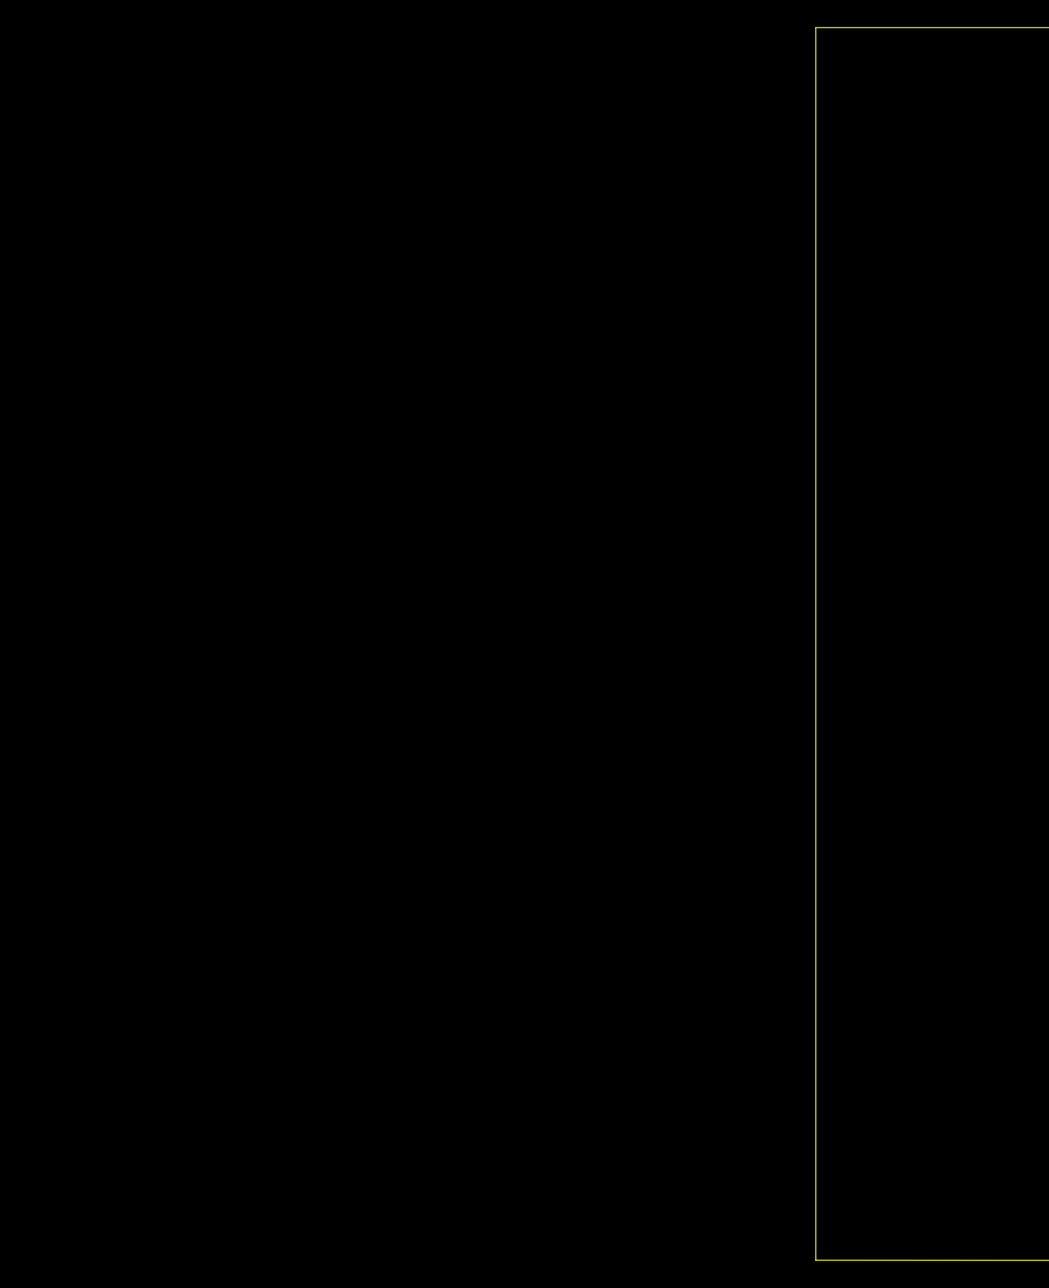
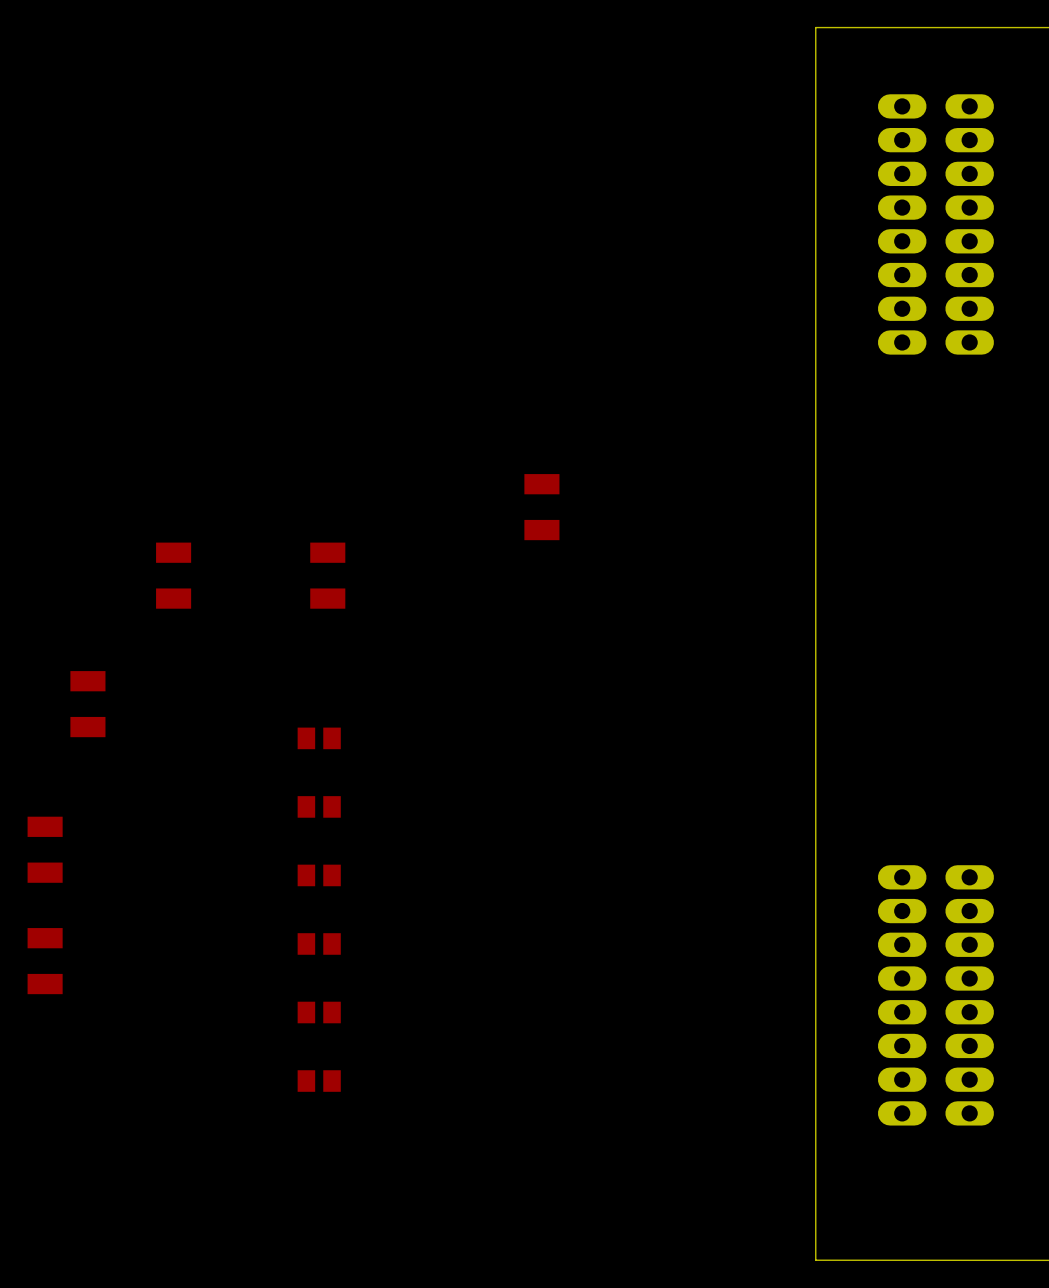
part: none -> (935, 224)
part: none -> (541, 507)
part: none -> (173, 575)
part: none -> (327, 575)
part: none -> (87, 704)
part: none -> (319, 738)
part: none -> (319, 806)
part: none -> (45, 849)
part: none -> (319, 875)
part: none -> (319, 943)
part: none -> (45, 961)
part: none -> (935, 995)
part: none -> (319, 1012)
part: none -> (319, 1081)

